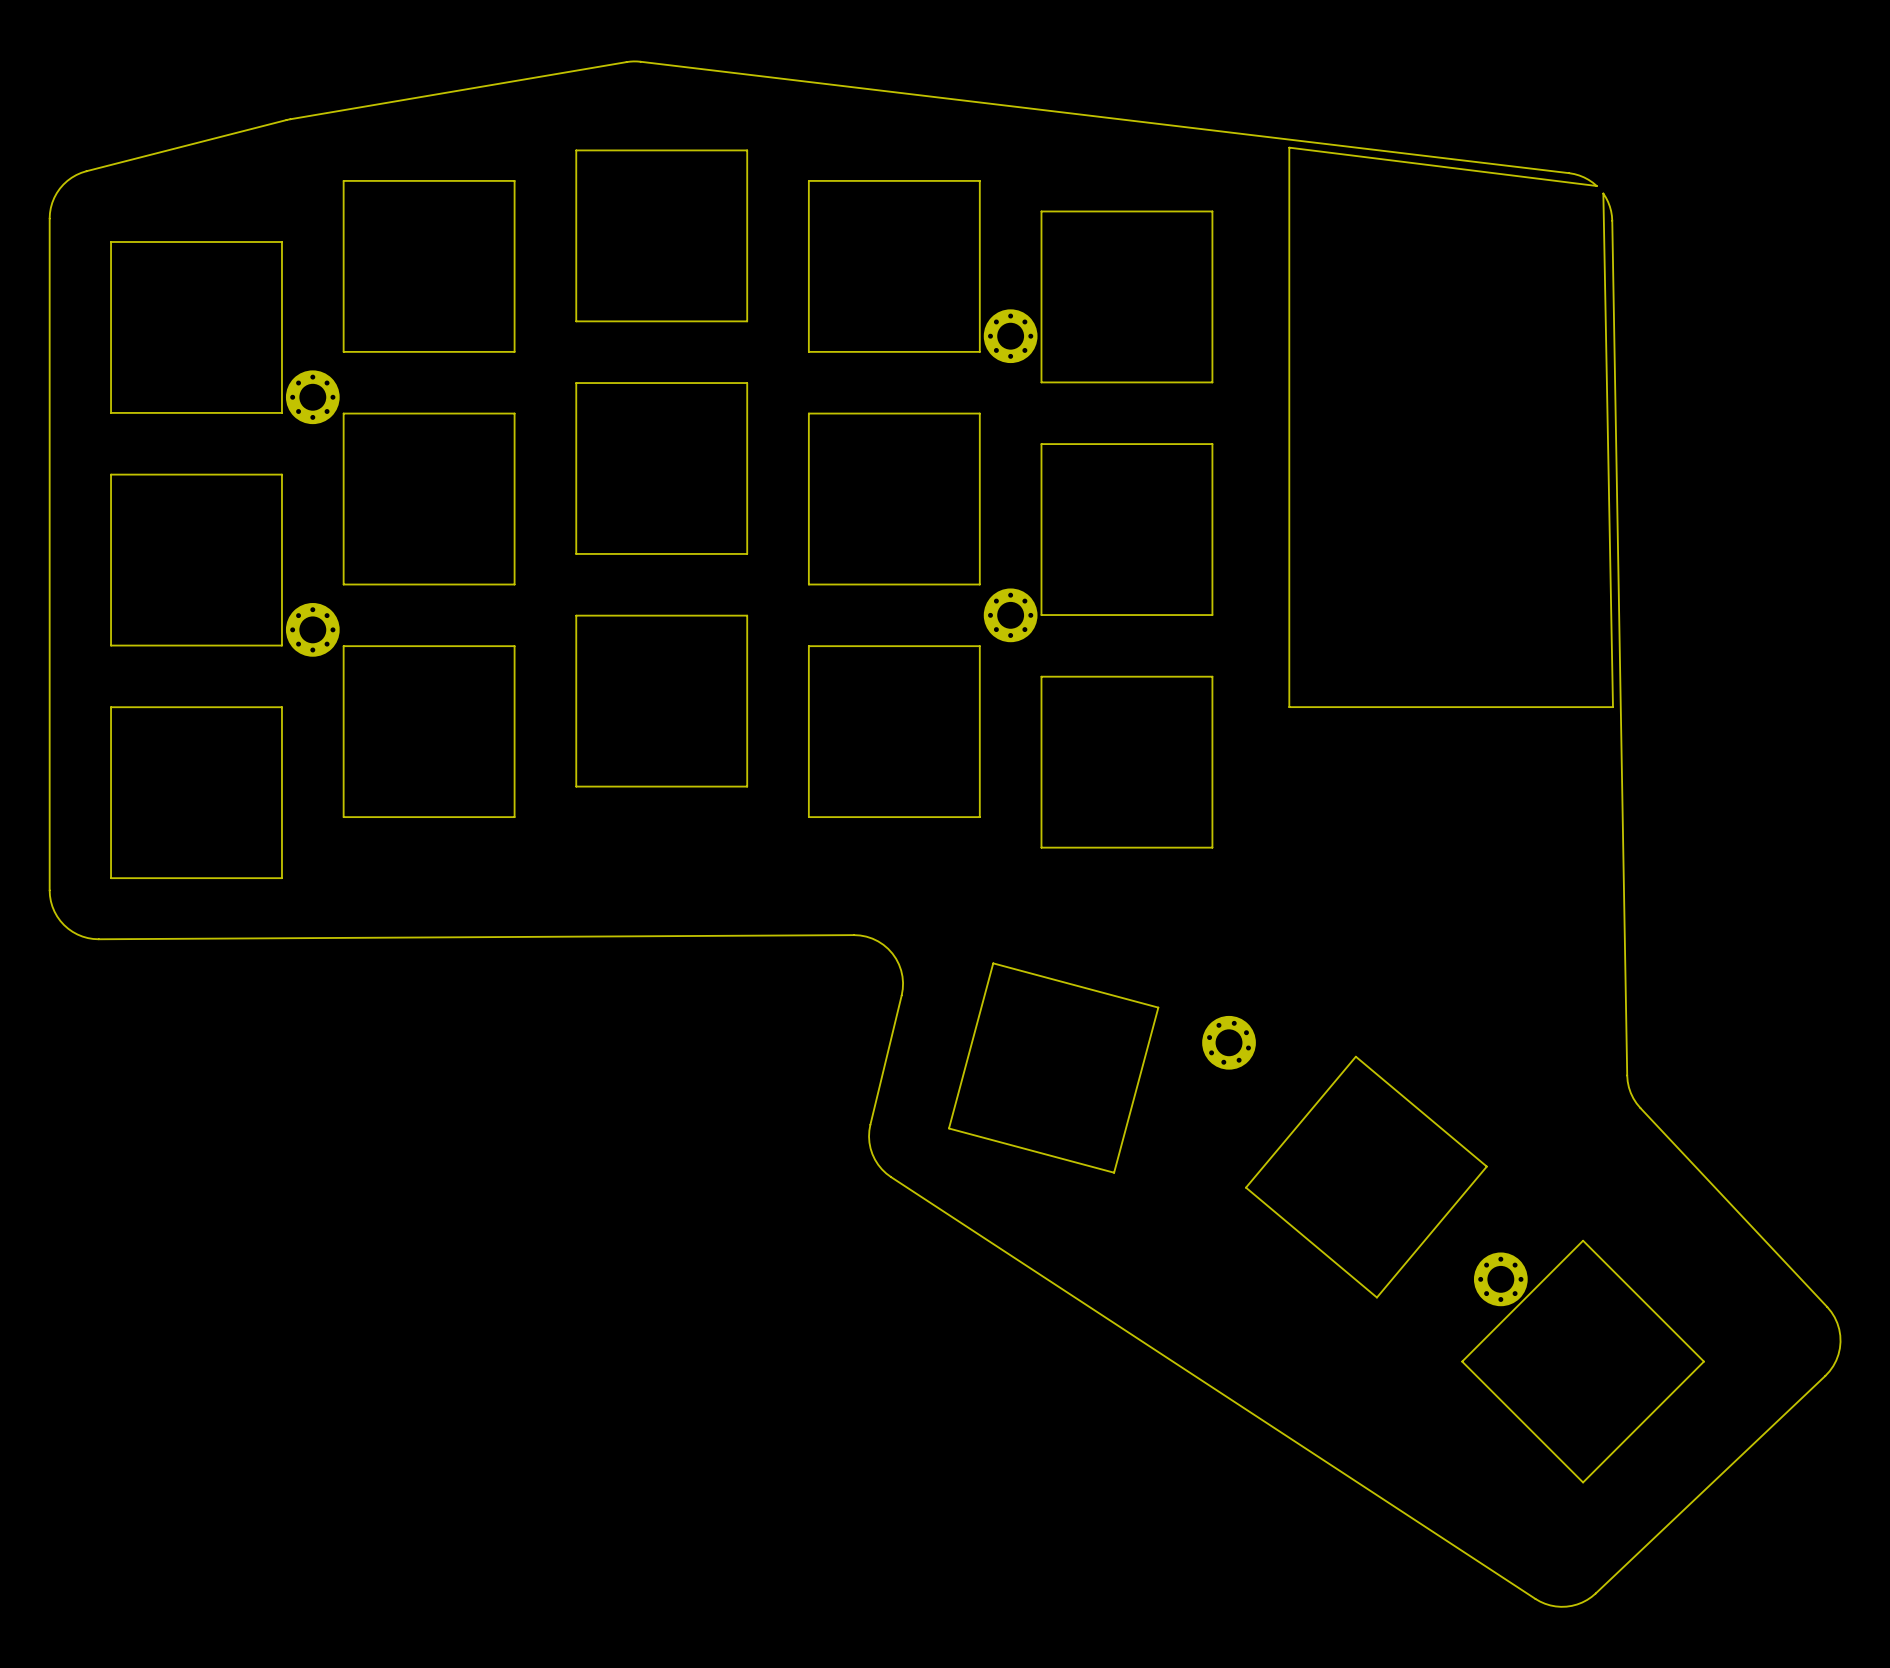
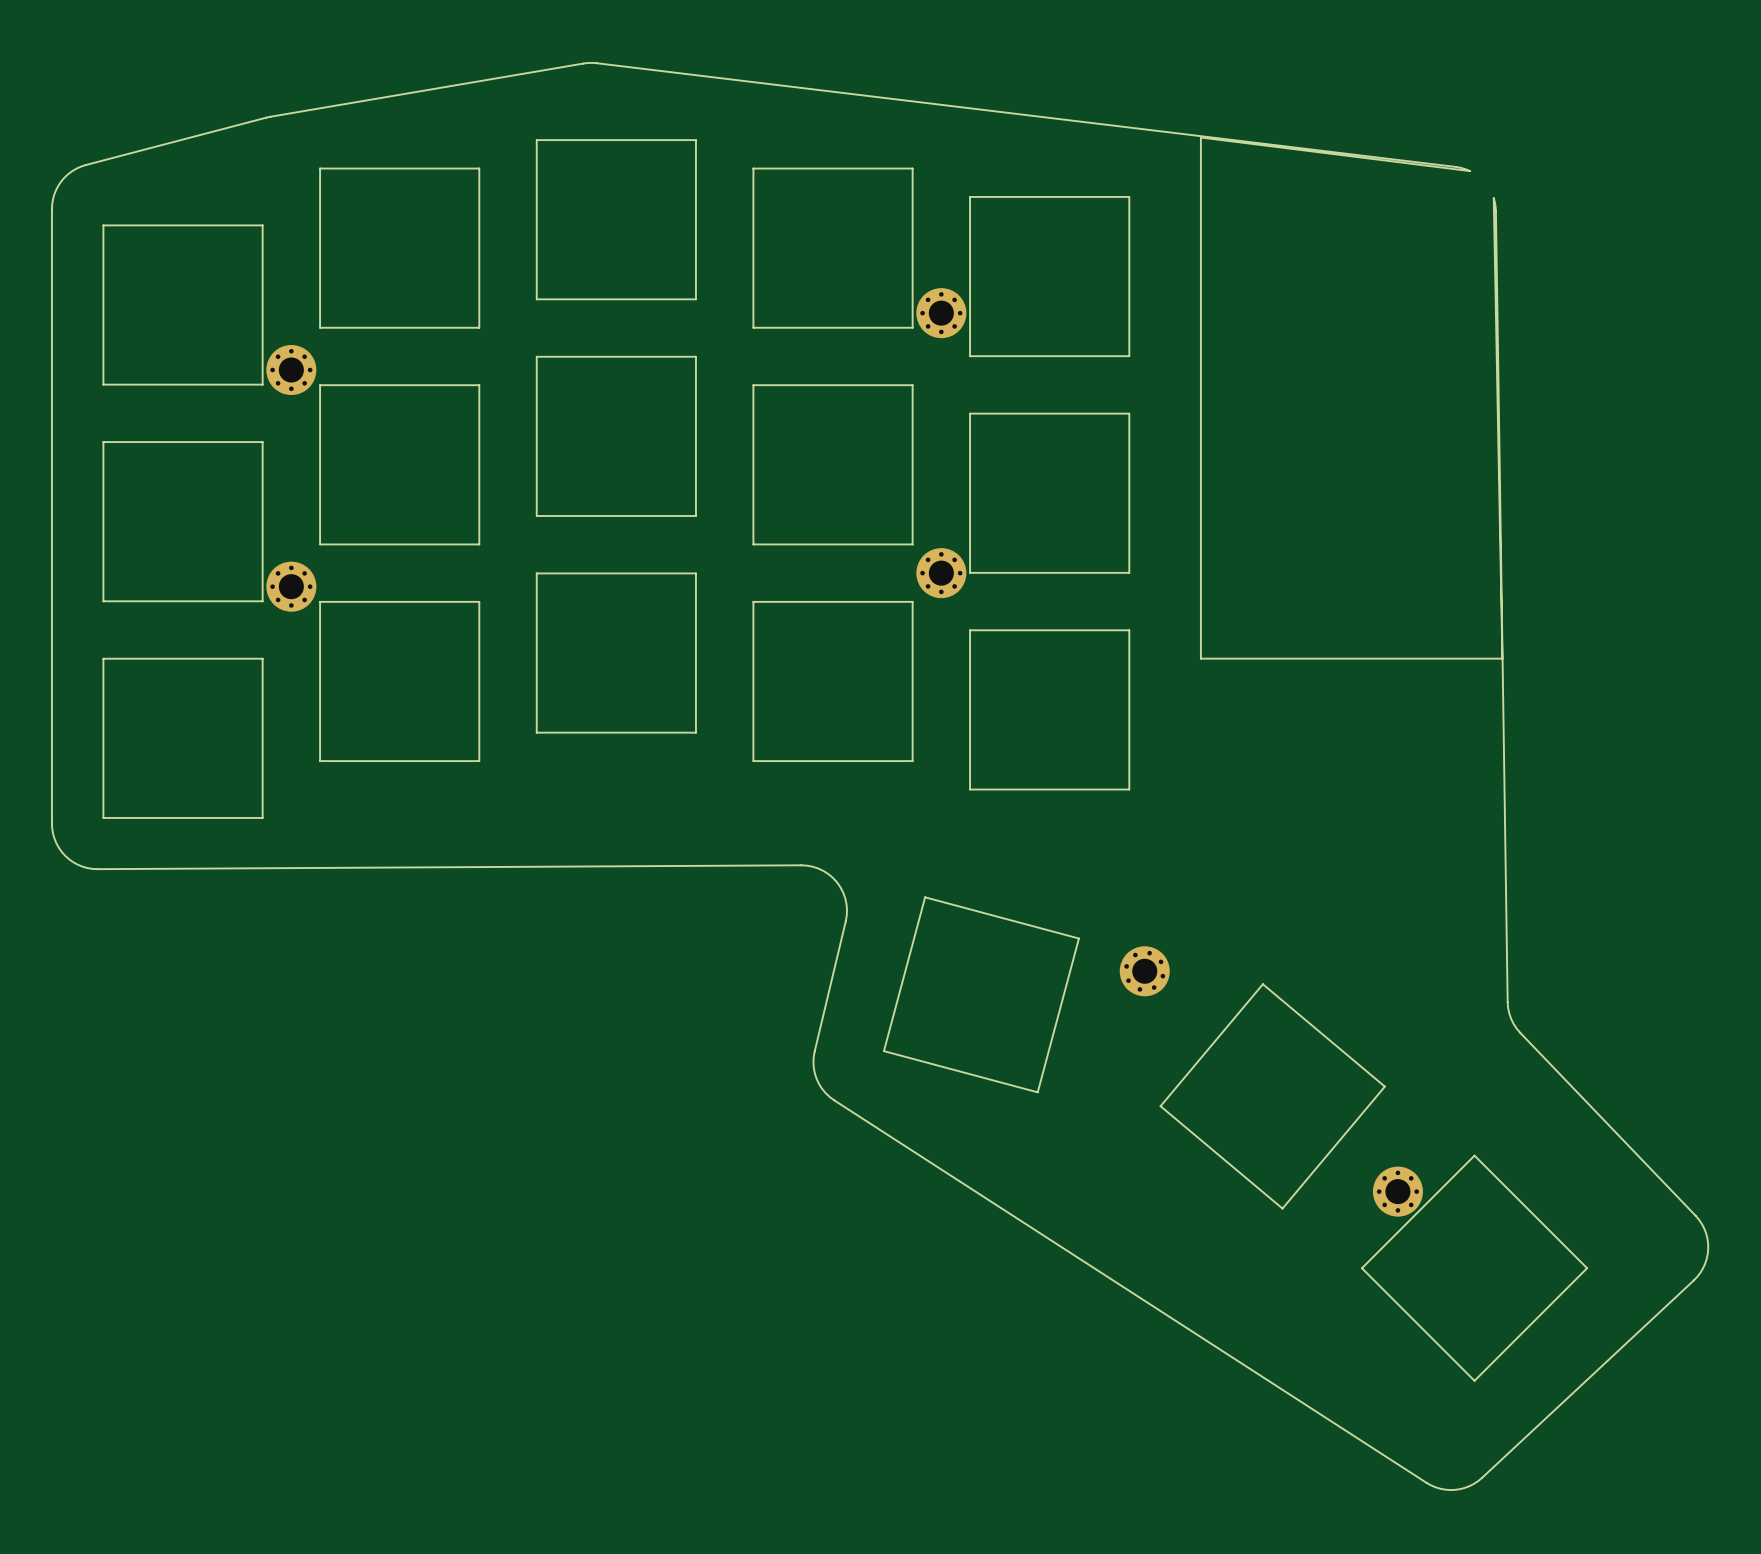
board edge: (1578, 183) (1596, 186) (1584, 177) (1569, 173) (633, 61) (288, 119) (86, 171) (71, 177) (59, 188) (52, 202) (49, 218) -> none
board edge: (1603, 212) (1603, 193) (1609, 206) (1612, 220) (1628, 1087) (1640, 1108) (1827, 1307) (1837, 1323) (1840, 1341) (1836, 1360) (1825, 1375) (1595, 1593) (1577, 1604) (1561, 1606) (1545, 1603) (1535, 1598) (881, 1169) (872, 1154) (869, 1130) (903, 982) (901, 970) (896, 958) (883, 944) (872, 938) (853, 935) (98, 939) (82, 936) (64, 925) (52, 906) (49, 890) (49, 218) -> (1493, 198) (1495, 211) (1508, 1007) (1511, 1018) (1520, 1032) (1698, 1219) (1706, 1233) (1708, 1248) (1705, 1263) (1693, 1280) (1482, 1477) (1469, 1486) (1460, 1489) (1445, 1489) (1426, 1482) (825, 1093) (816, 1079) (813, 1057) (847, 909) (845, 898) (837, 882) (828, 874) (818, 868) (801, 865) (97, 869) (87, 868) (73, 862) (65, 855) (56, 843) (51, 823) (51, 209) (54, 194) (58, 185) (68, 174) (76, 168) (268, 117) (590, 62) (1455, 166) (1470, 171)

